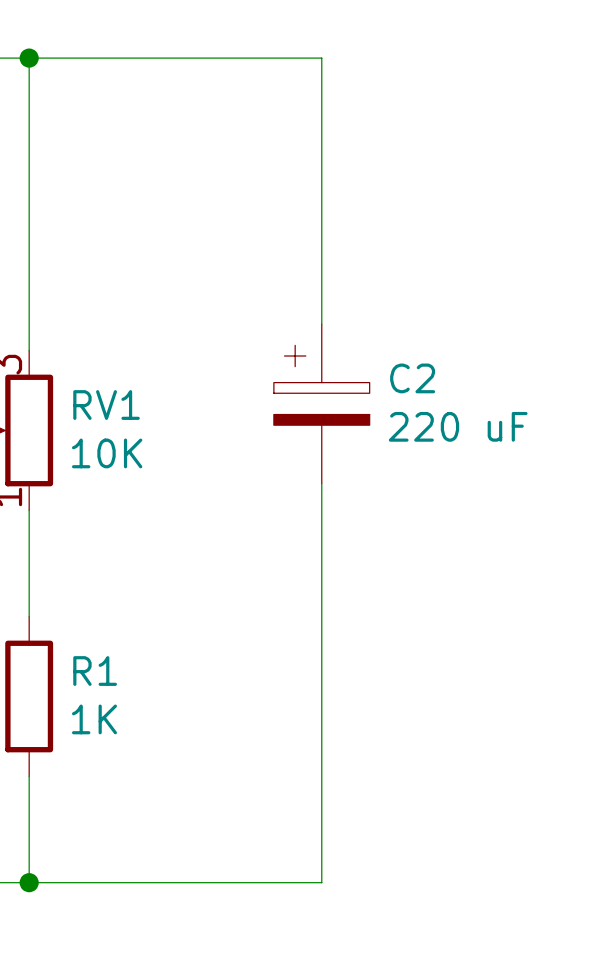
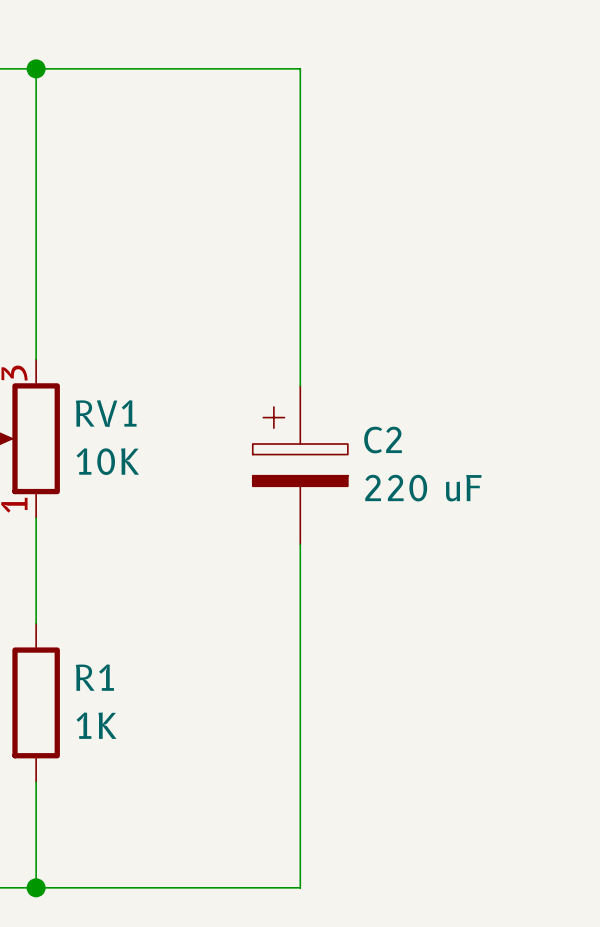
wire: (295, 58) (321, 58) (321, 324) -> (300, 68) (300, 385)
C2 position: (321, 403) -> (300, 465)
wire: (321, 483) (321, 882) (295, 882) -> (300, 544) (300, 887)

